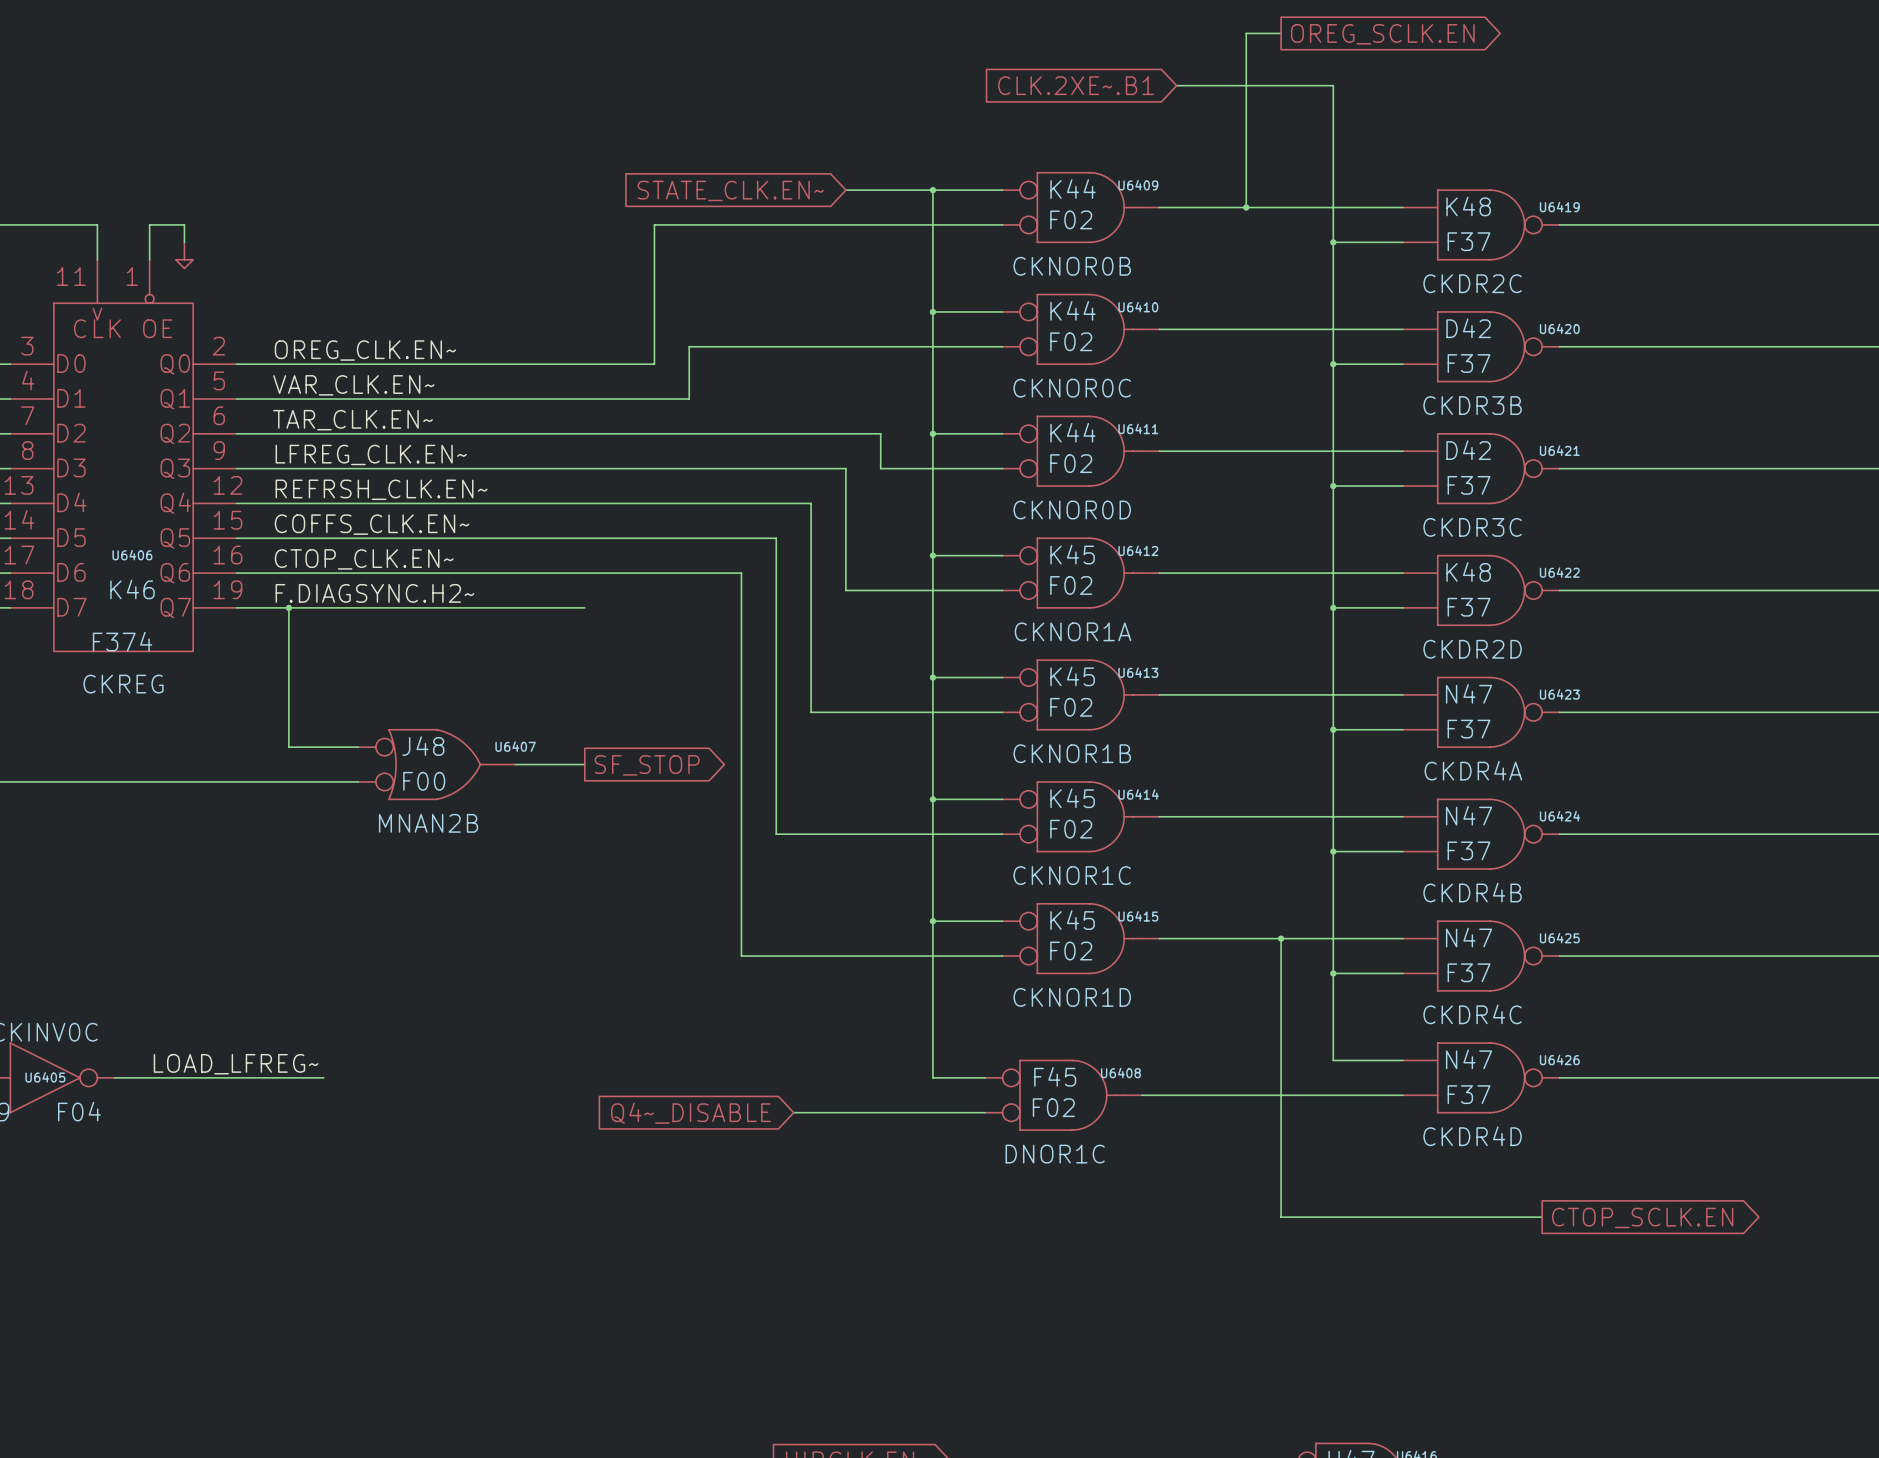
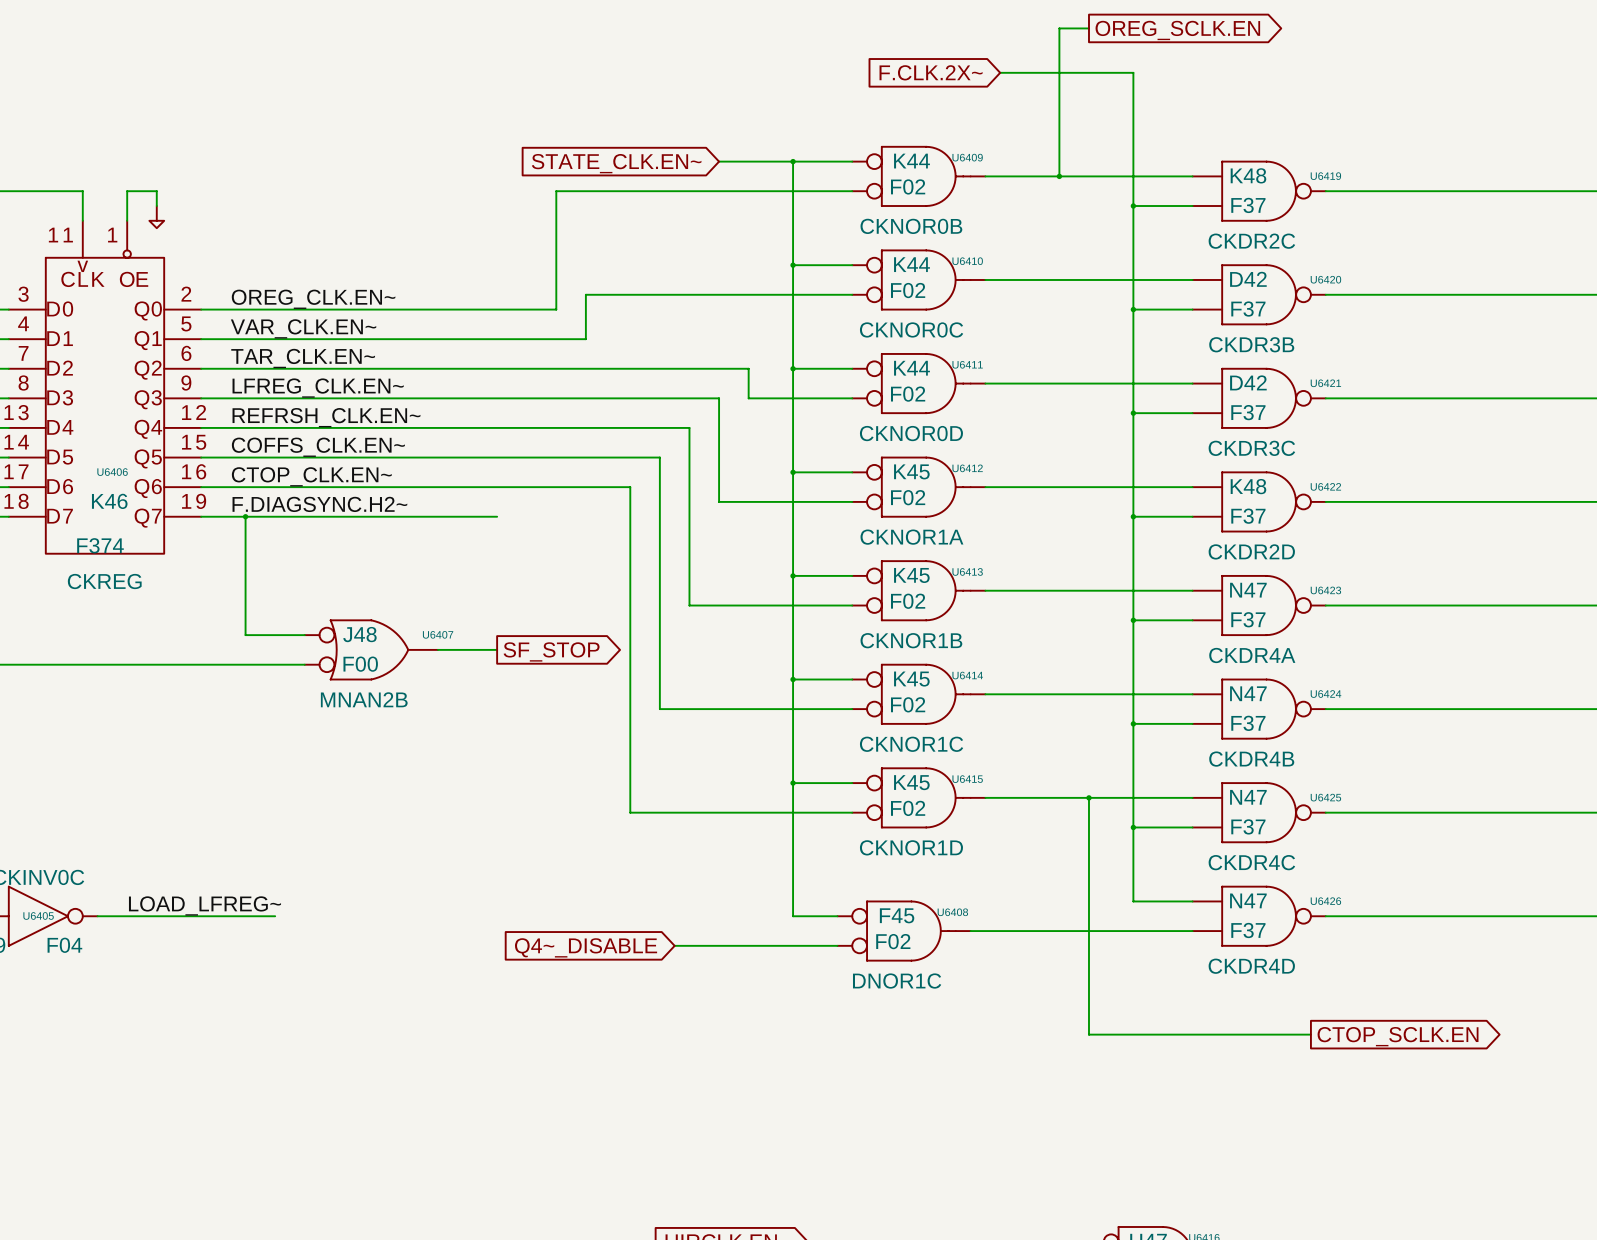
global label: CLK.2XE~.B1 (1075, 85) -> F.CLK.2X~ (931, 72)

